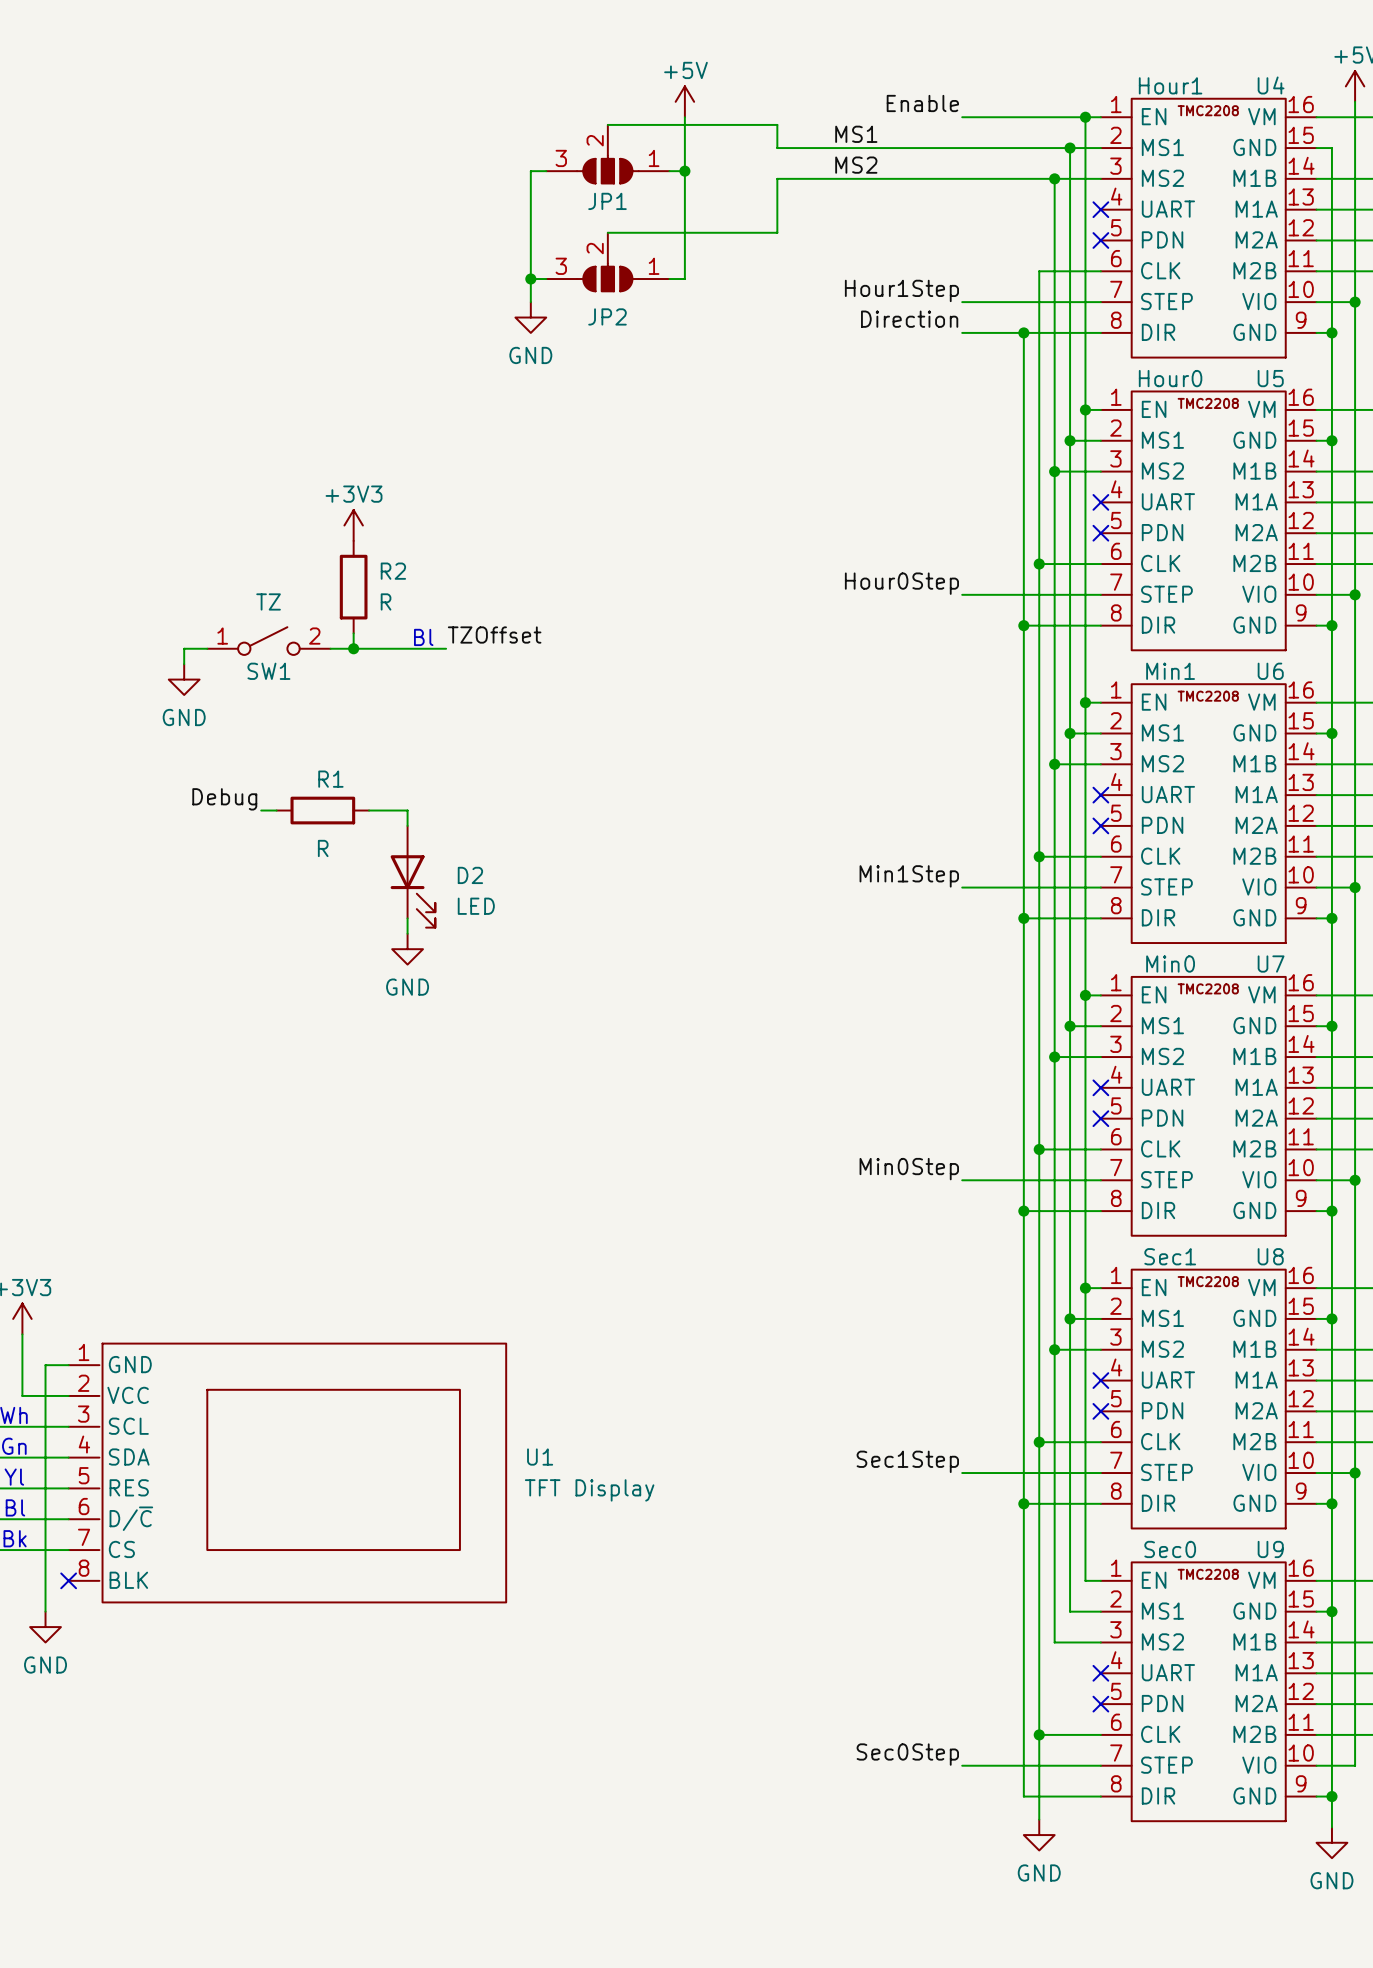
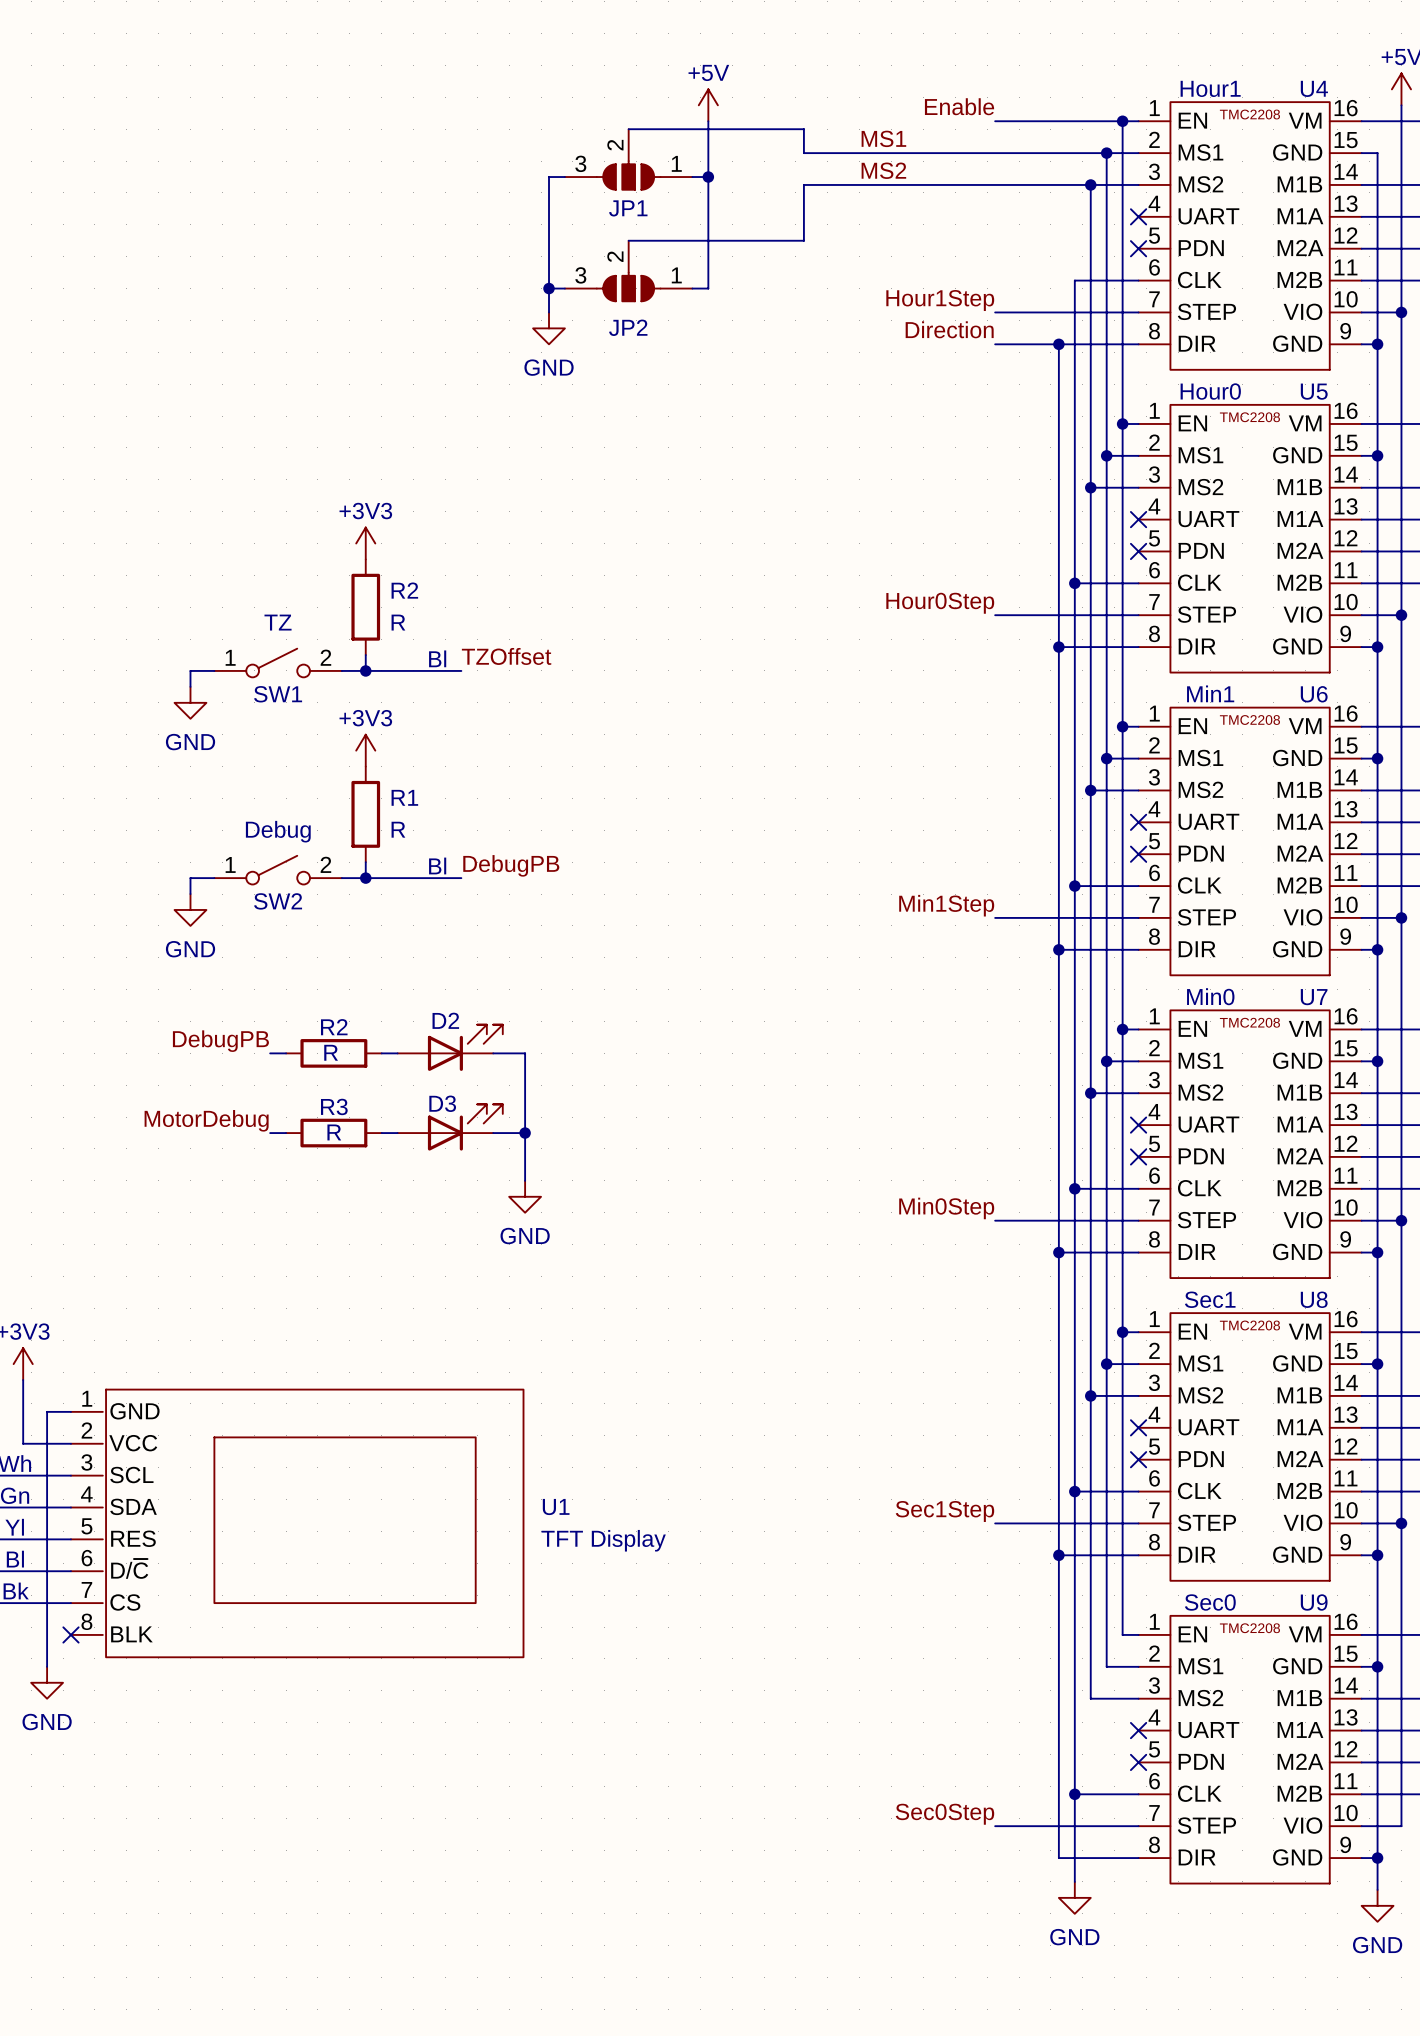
power symbol: none -> +3V3 (365, 750)
R1 name position: R1 (330, 779) -> R1 (404, 797)
label: Debug (224, 799) -> none
wire: (261, 810) (276, 810) -> (270, 1053) (286, 1053)
R1 rotation: 0° (322, 810) -> 90° clockwise (365, 814)
wire: (369, 810) (407, 810) (407, 825) -> none
text: none -> Bl (437, 865)
label: none -> DebugPB (511, 865)
SW2: none -> Debug (278, 870)
R1 value position: R (323, 848) -> R (398, 829)
wire: none -> (214, 878) (190, 878) (190, 894)
wire: none -> (341, 878) (461, 878)
junction: none -> (365, 878)
D2 name position: D2 (470, 875) -> D2 (445, 1020)
D2 position: (412, 876) -> (450, 1047)
power symbol: none -> GND (190, 909)
D2 rotation: 0° (412, 891) -> 90° counterclockwise (465, 1047)
D2 value: LED (476, 906) -> none
wire: (407, 918) (407, 933) -> (365, 862) (365, 878)
power symbol: GND (407, 949) -> none
label: none -> DebugPB (220, 1041)
R2: none -> R (333, 1053)
wire: none -> (381, 1053) (397, 1053)
wire: none -> (493, 1053) (525, 1053) (525, 1180)
label: none -> MotorDebug (206, 1120)
D3: none -> (450, 1127)
wire: none -> (270, 1133) (286, 1133)
R3: none -> R (333, 1133)
wire: none -> (381, 1133) (397, 1133)
wire: none -> (493, 1133) (525, 1133)
junction: none -> (525, 1133)
power symbol: none -> GND (525, 1196)

